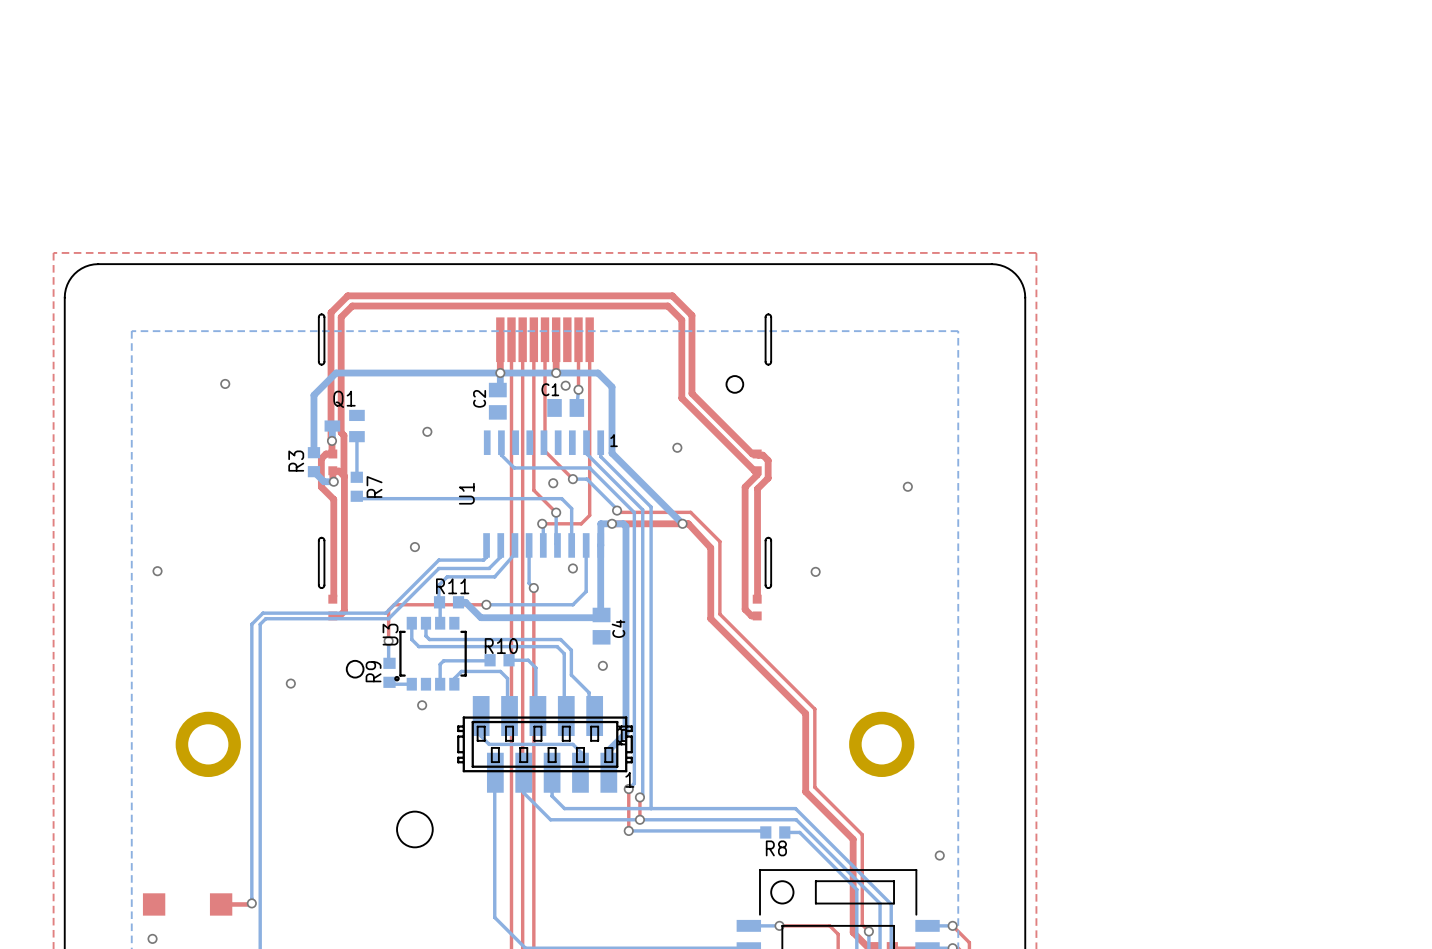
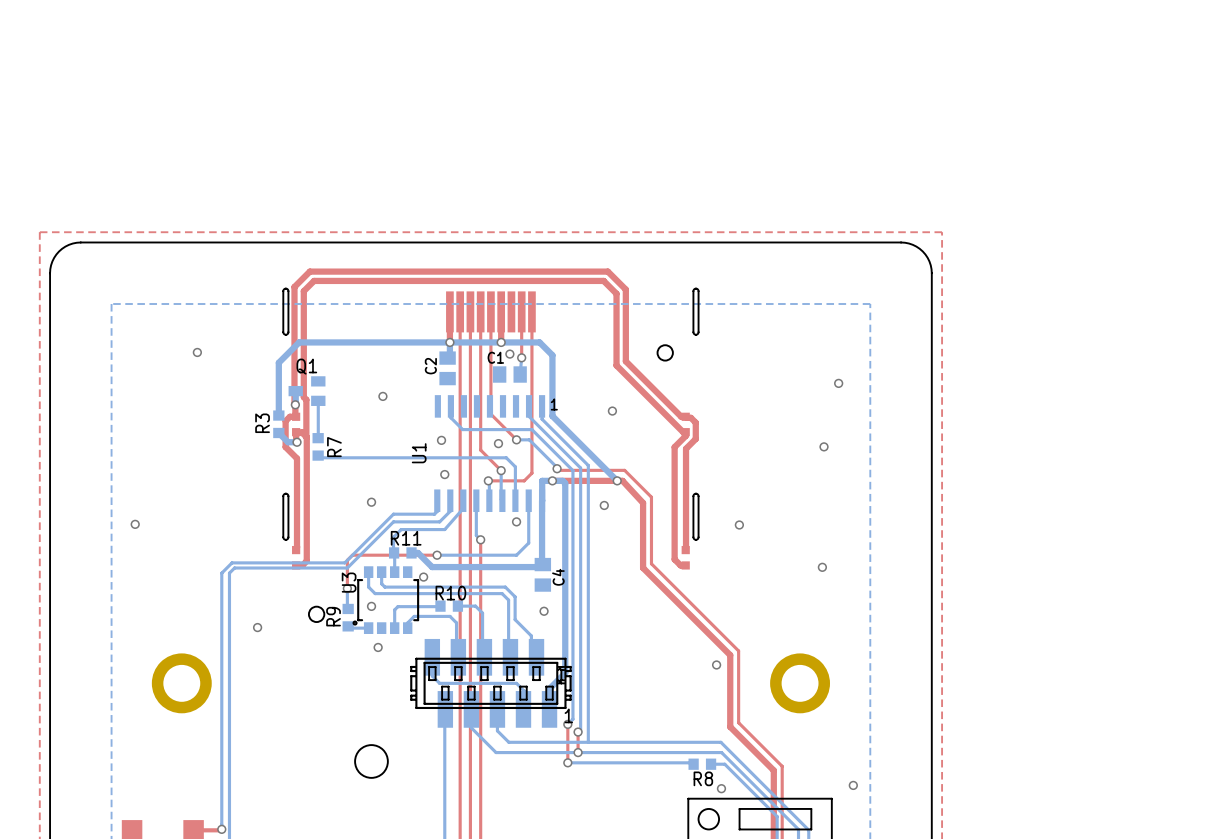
via: none -> (838, 383)
via: none -> (441, 440)
via: none -> (444, 474)
via: none -> (604, 505)
via: none -> (822, 567)
via: none -> (423, 577)
via: none -> (371, 606)
via: none -> (716, 664)
via: none -> (721, 788)

